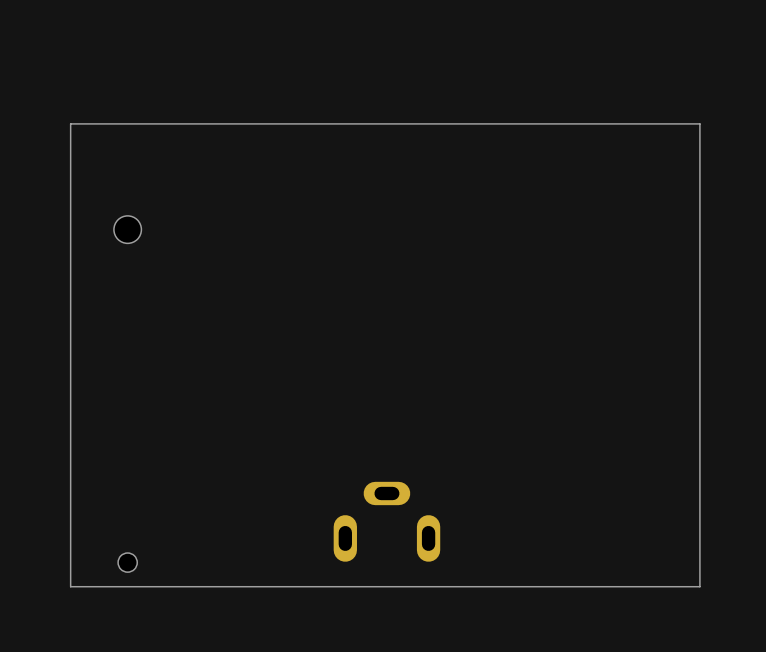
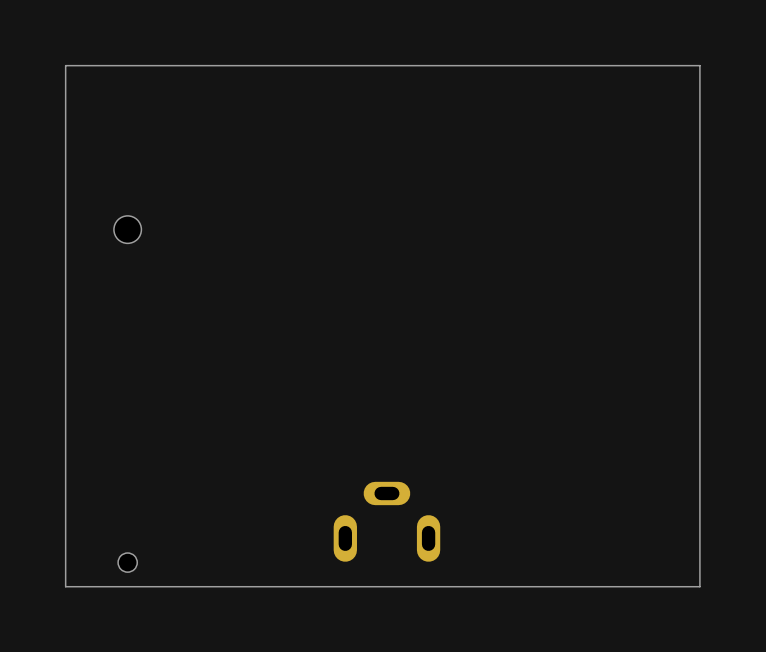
board edge: (699, 123) (70, 123) (70, 586) -> (699, 123) (699, 65) (65, 65) (65, 586) (70, 586)

